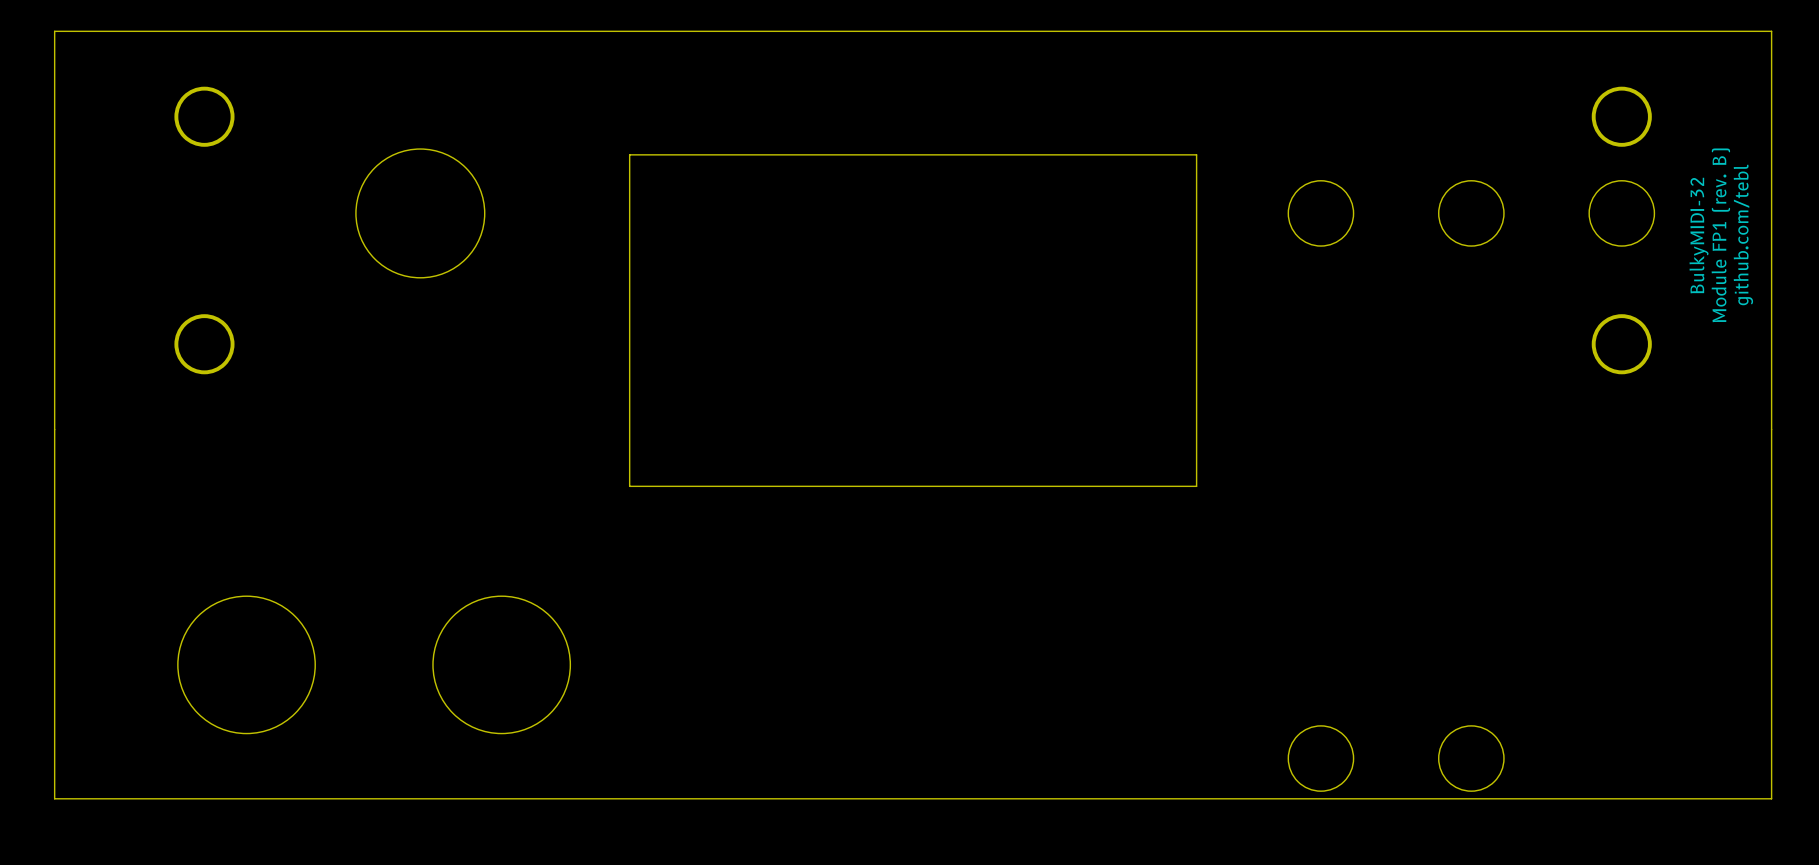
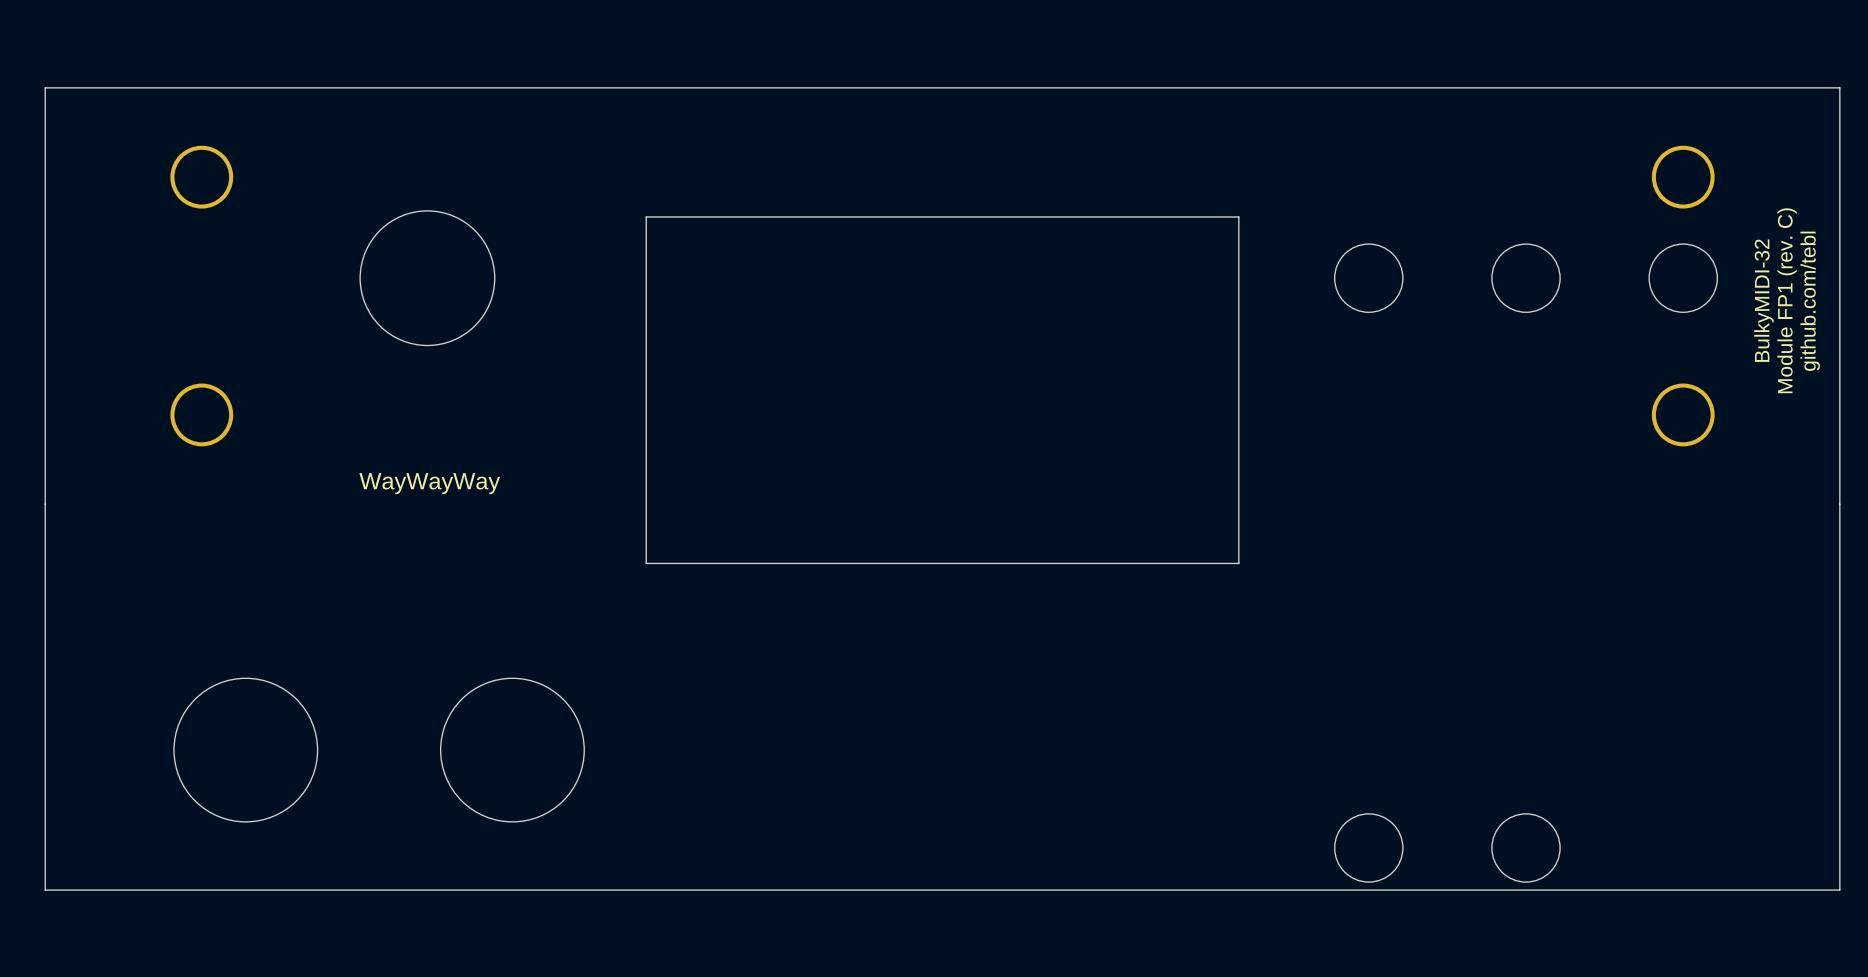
text: Module FP1 (rev. B) (1720, 235) -> Module FP1 (rev. C) (1787, 300)
text: none -> WayWayWay (429, 483)

